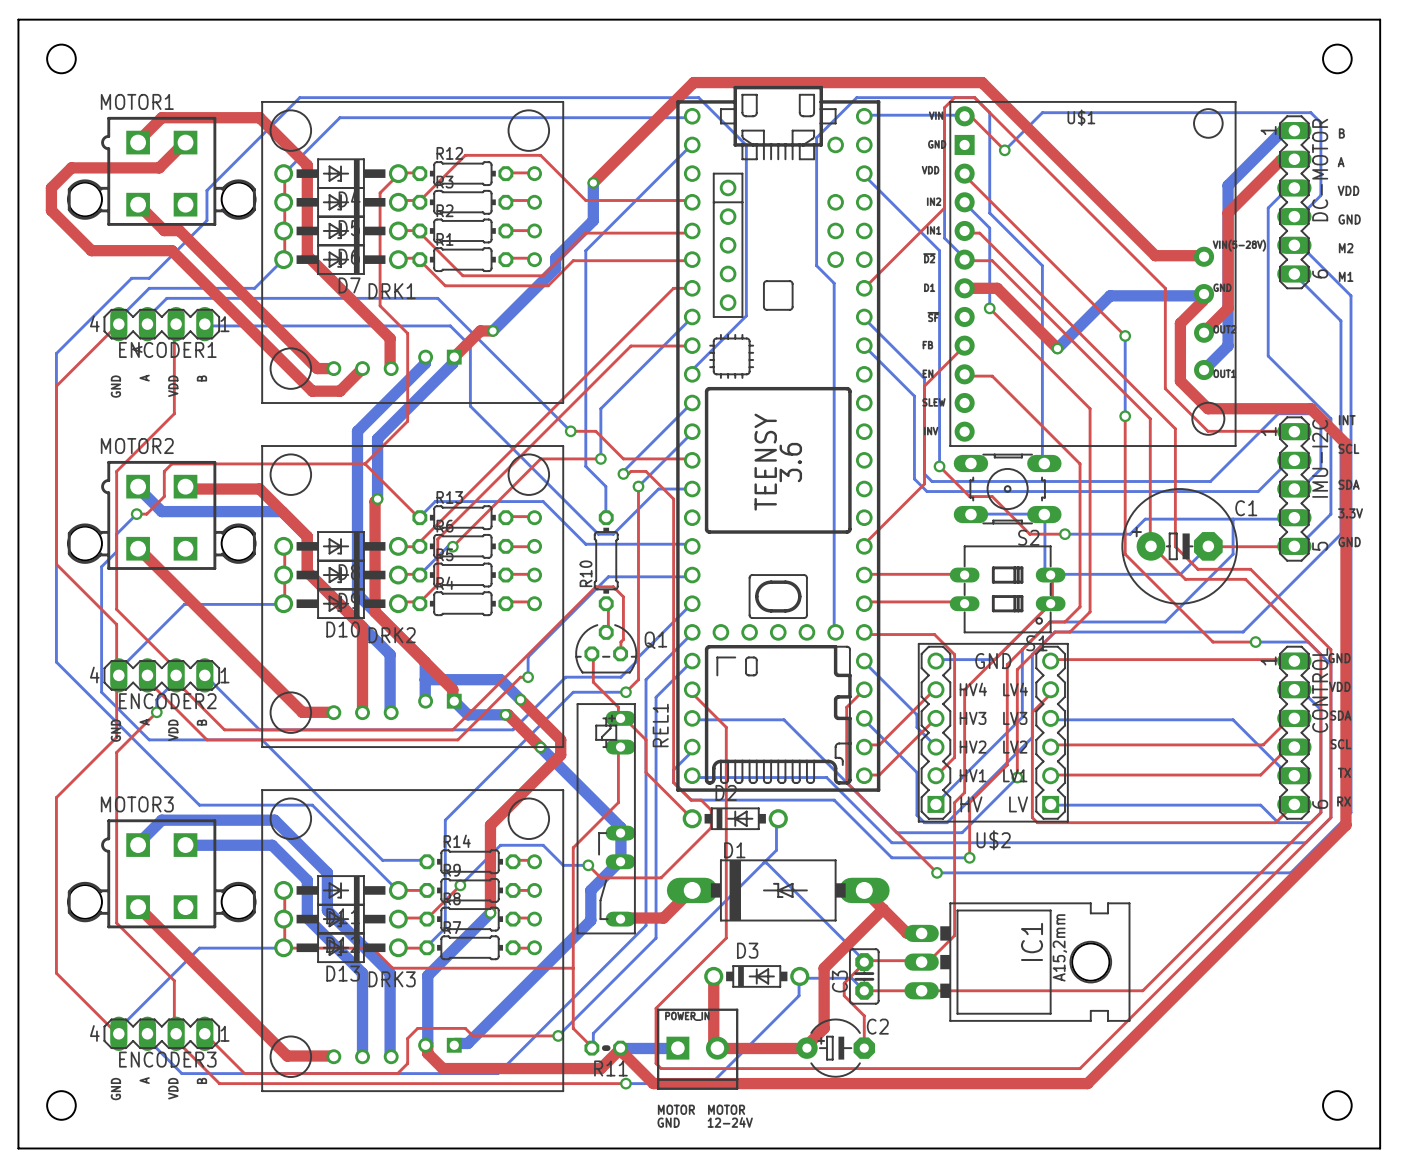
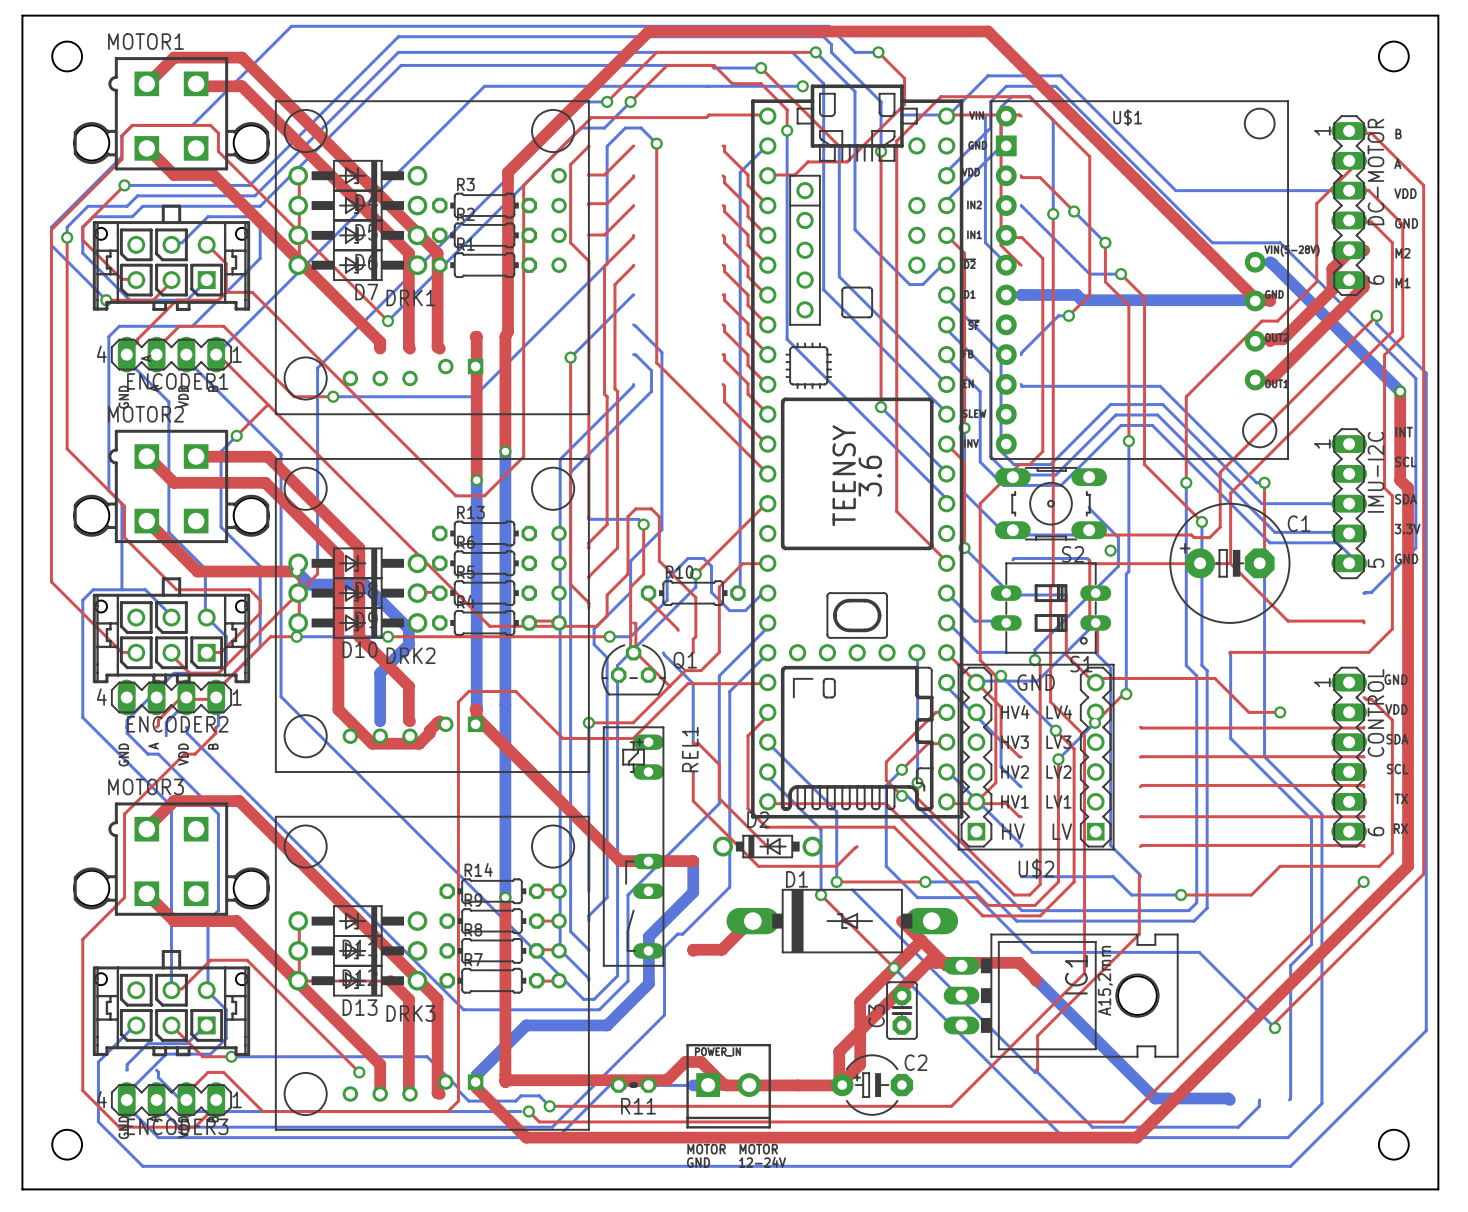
top track: none -> (815, 52) (656, 52) (607, 101)
bottom track: none -> (815, 52) (854, 91) (854, 229) (909, 284) (922, 284) (941, 266) (946, 265)
via: none -> (815, 52)
top track: none -> (878, 52) (904, 78) (904, 104) (847, 161) (808, 161) (794, 174) (767, 175)
bottom track: none -> (878, 52) (854, 52) (828, 26) (291, 26) (192, 125) (132, 125) (121, 135) (121, 156) (51, 227) (51, 245) (106, 300)
via: none -> (878, 52)
top track: none -> (761, 68) (839, 146)
bottom track: none -> (761, 68) (714, 68) (711, 65) (401, 65) (260, 206) (142, 206) (132, 216) (93, 216) (82, 227) (82, 253) (129, 300) (187, 300) (206, 280)
via: none -> (761, 68)
top track: none -> (146, 83) (174, 57) (241, 57) (437, 253) (437, 347) (439, 348)
bottom track: none -> (802, 86) (484, 86) (216, 354)
via: none -> (802, 86)
top track: (954, 97) (944, 107) (944, 208) (864, 288) -> (995, 96) (941, 96) (896, 141) (896, 511) (946, 563)
bottom track: (969, 97) (856, 97) (816, 137) (816, 265) (834, 283) (835, 632) -> (1011, 96) (1001, 107) (1001, 146) (948, 198) (948, 203) (946, 205)
top track: (974, 97) (1165, 288) (1165, 388) (1207, 431) (1294, 431) -> (1016, 96) (1029, 96) (1089, 156) (1089, 294) (1068, 315)
bottom track: (974, 97) (989, 112) (989, 213) -> (1016, 96) (1029, 96) (1053, 120) (1053, 214)
bottom track: none -> (607, 101) (583, 101) (317, 368) (317, 563)
via: none -> (607, 101)
top track: none -> (630, 101) (667, 65) (714, 65) (732, 83) (761, 83) (787, 109) (787, 130)
bottom track: none -> (630, 101) (604, 128) (581, 128) (388, 321)
via: none -> (630, 101)
bottom track: (906, 115) (964, 116) -> (946, 114) (948, 114) (988, 75) (1061, 75) (1175, 190) (1342, 190)
top track: none -> (1001, 114) (1001, 245) (1021, 265)
bottom track: (692, 116) (339, 117) (283, 173) -> none
top track: none -> (767, 116) (708, 114) (706, 117) (591, 117) (523, 185) (523, 456) (484, 495) (455, 495) (252, 292) (226, 292)
top track: none -> (946, 116) (1021, 116)
top track: (964, 116) (972, 117) (1004, 150) -> none
top track: (259, 117) (161, 117) (138, 142) -> (273, 117) (241, 86) (197, 86) (196, 83)
bottom track: none -> (787, 130) (787, 339) (946, 498) (946, 503)
via: none -> (787, 130)
bottom track: (1294, 130) (1293, 132) (1280, 132) (1228, 185) (1228, 346) (1204, 370) -> none
top track: none -> (1364, 131) (1371, 133) (1423, 185) (1423, 874) (1274, 1022) (1274, 1028)
top track: (185, 142) (159, 167) (71, 167) (51, 187) (51, 210) (76, 235) -> (124, 185) (82, 227) (82, 240)
top track: none -> (656, 143) (656, 362) (767, 473)
bottom track: none -> (656, 143) (641, 128) (625, 128) (607, 146) (607, 263) (474, 396) (333, 396)
via: none -> (656, 143)
top track: none -> (588, 145) (570, 164) (570, 242) (588, 261) (588, 518)
top track: none -> (633, 145) (604, 174) (588, 175)
top track: none -> (723, 145) (724, 151) (748, 174) (748, 185) (767, 205)
bottom track: (692, 144) (585, 250) (585, 466) (605, 486) (606, 517) -> none
bottom track: none -> (767, 145) (740, 172) (740, 592) (737, 593)
bottom track: none -> (839, 146) (839, 276) (946, 384)
top track: none -> (146, 148) (174, 174) (213, 174) (380, 341) (380, 348)
top track: none -> (881, 151) (881, 407)
bottom track: none -> (881, 151) (881, 101) (831, 52) (831, 44) (823, 36) (398, 36) (249, 185) (124, 185)
via: none -> (881, 151)
bottom track: (1004, 150) (1042, 112) (1310, 112) (1320, 122) (1320, 195) (1300, 215) (1294, 216) -> none
via: (1004, 150) -> none
top track: (1294, 159) (1280, 160) (1228, 213) (1228, 308) (1204, 332) -> none
top track: none -> (1364, 160) (1358, 161) (1316, 203) (1316, 281) (1277, 321) (1261, 321) (1186, 396) (1186, 482)
top track: (307, 165) (307, 255) (390, 338) (391, 368) -> (322, 167) (408, 253) (410, 348)
MOTOR1 position: (161, 171) -> (171, 113)
top track: (419, 173) (398, 173) (380, 192) (380, 305) (407, 333) (407, 421) (365, 463) -> none
R12: (462, 173) -> none
top track: (505, 173) (534, 173) -> none
top track: none -> (633, 175) (607, 203) (588, 203) (588, 205)
top track: none -> (723, 175) (724, 182) (748, 206) (748, 216) (767, 235)
bottom track: (864, 173) (939, 250) (939, 381) -> (946, 354) (948, 354) (948, 360) (980, 391)
bottom track: none -> (946, 175) (948, 174) (948, 169) (990, 128) (990, 101) (1006, 86) (1055, 86) (1212, 242) (1280, 242) (1415, 378) (1415, 548) (1371, 592)
top track: (964, 173) (1125, 335) -> none
top track: none -> (1021, 175) (1021, 177) (1040, 177) (1074, 211)
via: none -> (124, 185)
top track: (593, 182) (693, 82) (982, 82) (1155, 255) (1204, 256) -> none
bottom track: (593, 182) (593, 220) (555, 258) (555, 268) (492, 330) -> none
via: (593, 182) -> none
bottom track: (1288, 187) (1268, 208) (1268, 356) (1330, 418) (1330, 514) (1300, 544) (1295, 544) (1294, 546) -> none
top track: none -> (1364, 190) (1368, 190) (1402, 224) (1402, 336) (1384, 354) (1384, 488) (1392, 495) (1392, 628) (1368, 652) (1229, 652)
top track: (398, 202) (400, 200) (417, 200) (419, 202) (465, 155) (540, 155) (585, 200) (691, 200) (692, 202) -> (767, 265) (748, 245) (748, 234) (724, 211) (723, 205)
top track: (505, 202) (508, 200) (533, 200) (534, 202) -> none
top track: none -> (633, 205) (604, 234) (588, 235)
bottom track: (964, 202) (989, 228) (989, 308) -> none
bottom track: none -> (1021, 205) (1032, 216)
top track: (138, 204) (164, 230) (179, 230) (317, 368) (333, 368) -> none
bottom track: none -> (1074, 211) (1105, 242)
via: none -> (1074, 211)
via: none -> (1053, 214)
top track: none -> (1364, 220) (1371, 221) (1392, 242) (1392, 331) (1230, 493) (1229, 563)
top track: (398, 230) (419, 230) (462, 275) (543, 275) (585, 233) (691, 233) (692, 230) -> (767, 294) (748, 276) (748, 266) (724, 242) (723, 235)
top track: (505, 230) (534, 230) -> none
top track: none -> (633, 235) (604, 266) (607, 524) (588, 542) (588, 548)
bottom track: none -> (67, 237) (67, 227) (88, 206) (127, 206) (137, 195) (254, 195) (398, 52) (792, 52) (823, 83) (823, 289) (946, 414)
via: none -> (67, 237)
top track width: thick (76, 235) (91, 250) -> thin (82, 240) (98, 255)
top track: none -> (1105, 242) (1105, 281) (1128, 305) (1128, 441)
via: none -> (1105, 242)
bottom track: none -> (171, 244) (171, 242) (181, 242) (208, 216) (249, 216) (260, 227) (260, 258) (192, 326) (119, 326) (108, 336) (108, 490) (121, 503) (121, 589)
top track: none -> (206, 244) (226, 263) (226, 292)
bottom track: (1294, 245) (1300, 245) (1350, 295) (1350, 812) (1290, 872) (937, 872) -> none
top track: none -> (1364, 250) (1350, 250) (1332, 268) (1332, 289) (1282, 339) (1272, 339) (1270, 341)
top track: (91, 250) (171, 250) (312, 391) (339, 391) (362, 368) -> (98, 255) (121, 279) (136, 280)
part: none -> (171, 257)
top track: (999, 253) (1175, 428) (1175, 546) (1197, 569) (1250, 569) (1330, 649) (1330, 817) (1080, 1068) (911, 1068) -> none
bottom track: none -> (1270, 262) (1400, 391)
bottom track: (283, 259) (254, 288) (149, 288) (119, 318) (118, 324) -> none
top track: (398, 259) (417, 258) (445, 285) (548, 285) (573, 260) (692, 259) -> (767, 324) (748, 305) (748, 294) (724, 271) (723, 265)
top track: (505, 259) (534, 259) -> none
top track: none -> (633, 265) (614, 284) (614, 388) (617, 391) (617, 548) (588, 578)
top track: (964, 259) (992, 260) (1150, 418) (1151, 546) (1185, 579) (1245, 579) (1320, 654) (1320, 812) (1142, 990) (864, 990) -> none
bottom track: (1042, 265) (1042, 461) (1044, 463) -> (1087, 271) (1089, 274) (1121, 274)
top track: none -> (1121, 274) (1144, 297) (1144, 464) (1201, 521)
via: none -> (1121, 274)
top track: none -> (171, 280) (153, 300) (106, 300)
bottom track: (1294, 273) (1340, 320) (1340, 534) (1243, 632) (1054, 632) (1032, 654) (1032, 737) (947, 822) (924, 822) (916, 815) (916, 772) (864, 718) -> none
top track: none -> (1364, 280) (1363, 287) (1270, 379)
top track: none -> (226, 292) (218, 300) (176, 300) (137, 339) (137, 341) (126, 354)
bottom track: none -> (633, 294) (570, 357)
top track: (692, 288) (673, 288) (417, 544) (419, 546) (398, 546) -> (723, 294) (724, 300) (748, 323) (748, 334) (767, 354)
bottom track: none -> (946, 294) (948, 294) (948, 300) (1001, 352) (1001, 451) (1014, 464) (1050, 464) (1110, 404) (1162, 404) (1261, 503) (1349, 503)
top track: (964, 288) (997, 288) (1057, 348) -> none
bottom track: none -> (1021, 294) (1076, 294) (1081, 300) (1270, 300)
via: none -> (106, 300)
top track: (1204, 294) (1202, 300) (1180, 323) (1180, 381) (1207, 408) (1310, 408) (1345, 443) (1345, 825) (1087, 1083) (1077, 1083) -> (1363, 881) (1123, 1121)
bottom track: (1204, 294) (1202, 295) (1110, 295) (1057, 348) -> none
top track: none -> (1270, 300) (1256, 300) (988, 31) (648, 31) (508, 172) (505, 451)
top track: (989, 308) (1090, 408) (1090, 611) (1070, 632) (1054, 632) (1017, 669) (1017, 777) -> none
via: (989, 308) -> none
bottom track: none -> (1068, 315) (1058, 315) (1021, 354)
via: none -> (1068, 315)
top track: none -> (1376, 315) (1220, 472) (1220, 527) (1209, 537) (1194, 537) (1191, 534) (1092, 534)
bottom track: none -> (1376, 315) (1376, 323) (1426, 373) (1426, 1030) (1290, 1166) (142, 1166) (98, 1121) (98, 1061) (136, 1025)
via: none -> (1376, 315)
top track: none -> (388, 321) (218, 151) (218, 133) (210, 125) (132, 125) (121, 135) (121, 159) (51, 229) (51, 581) (121, 652) (136, 652)
via: none -> (388, 321)
top track: none -> (723, 324) (724, 331) (748, 354) (748, 365) (767, 384)
bottom track: (692, 316) (600, 408) (600, 458) -> none
bottom track: (864, 316) (924, 378) (924, 416) -> none
bottom track: none -> (946, 324) (948, 326) (948, 331) (990, 373) (990, 456) (1008, 474) (1055, 474) (1115, 414) (1157, 414) (1274, 532) (1364, 533)
top track: (118, 324) (56, 386) (56, 564) (116, 624) (116, 674) (118, 675) (116, 677) (116, 737) (56, 797) (56, 973) (118, 1033) -> none
bottom track: (147, 324) (149, 323) (149, 315) (166, 298) (437, 298) (570, 431) -> none
ENCODER1 position: (161, 324) -> (171, 354)
top track: (176, 324) (174, 325) (174, 413) (116, 471) (116, 491) -> (67, 237) (67, 448) (124, 506)
bottom track: (204, 324) (206, 325) (450, 325) (470, 346) (470, 406) (598, 534) (613, 534) -> (588, 921) (588, 915) (607, 897) (607, 657) (594, 644) (594, 628) (630, 592) (630, 561) (641, 550)
top track: none -> (475, 336) (476, 480)
top track: (492, 330) (480, 330) (454, 357) -> none
via: (492, 330) -> none
bottom track: (1125, 335) (1125, 416) -> none
via: (1125, 335) -> none
top track: none -> (156, 354) (158, 347) (179, 326) (223, 326) (294, 396) (333, 396)
top track: none -> (216, 354) (489, 626) (596, 626) (607, 615) (607, 595) (628, 574) (628, 516) (635, 508) (651, 508) (659, 516) (659, 561) (695, 597) (695, 636) (693, 639) (693, 652)
bottom track: none -> (633, 354) (651, 370) (651, 391) (570, 472) (570, 931) (588, 950)
top track: (692, 345) (630, 346) (437, 539) (437, 584) (419, 603) (417, 601) (400, 601) (398, 603) -> (723, 354) (724, 360) (748, 383) (748, 394) (767, 414)
bottom track: (864, 345) (914, 396) (914, 478) (927, 491) (1258, 491) (1288, 461) (1294, 460) -> none
top track: (964, 345) (924, 386) -> (946, 235) (964, 253) (964, 396)
top track: none -> (570, 357) (570, 584) (588, 602) (588, 608)
via: none -> (570, 357)
via: (1057, 348) -> none
bottom track: (425, 357) (425, 363) (357, 431) (357, 594) (425, 662) (425, 701) -> none
bottom track: (454, 357) (452, 363) (377, 438) (377, 499) -> none
bottom track: none -> (633, 384) (560, 459) (560, 949) (588, 978) (588, 980)
top track: none -> (723, 384) (724, 401) (767, 444)
bottom track: (692, 374) (693, 368) (746, 315) (746, 145) (698, 97) (299, 97) (206, 190) (206, 220) (149, 278) (131, 278) (56, 353) (56, 662) (199, 805) (312, 805) (398, 890) -> none
top track: (964, 374) (964, 376) (992, 376) (1080, 463) (1080, 606) (1064, 621) (1049, 621) (1007, 664) -> (1053, 214) (1053, 584) (1050, 587) (1050, 686)
bottom track: none -> (1021, 384) (1021, 386) (1160, 386) (1256, 482) (1264, 482)
top track: none -> (1400, 391) (1400, 480) (1408, 488) (1408, 866) (1136, 1137) (526, 1137) (476, 1088) (475, 1082)
via: none -> (1400, 391)
via: none -> (333, 396)
top track: none -> (268, 404) (236, 435)
bottom track: none -> (881, 407) (946, 473)
via: none -> (881, 407)
bottom track: (692, 403) (623, 471) (623, 473) -> none
top track: (924, 416) (924, 448) -> (946, 444) (964, 461)
via: none -> (964, 428)
top track: (1125, 416) (1125, 554) (1213, 642) (1255, 642) -> none
via: (1125, 416) -> none
bottom track: none -> (236, 435) (221, 451) (221, 527) (260, 566) (260, 647) (218, 688) (218, 725) (216, 727)
via: none -> (236, 435)
bottom track: none -> (1128, 441) (1126, 694)
via: none -> (1128, 441)
top track: (570, 431) (595, 431) (623, 458) (692, 460) -> none
via: (570, 431) -> none
bottom track: (692, 431) (638, 486) -> none
bottom track: none -> (505, 451) (505, 897)
via: none -> (505, 451)
part position: (778, 438) -> (857, 451)
top track: none -> (146, 456) (174, 482) (265, 482) (338, 555) (338, 709) (372, 743) (419, 743) (439, 721)
top track: none -> (196, 456) (268, 456) (359, 548) (359, 636) (408, 686) (410, 721)
bottom track: (939, 448) (939, 466) -> (980, 461) (1003, 485) (1061, 485) (1121, 425) (1152, 425) (1269, 542) (1337, 542) (1355, 561) (1363, 561) (1364, 563)
top track: (600, 458) (540, 458) (452, 546) -> none
via: (600, 458) -> none
top track: (365, 463) (419, 517) -> none
top track: (365, 463) (171, 463) (164, 471) (164, 496) (146, 514) (136, 514) -> none
bottom track: none -> (476, 480) (475, 709)
via: none -> (476, 480)
top track: (939, 466) (969, 496) (992, 496) (1029, 534) (1064, 534) -> none
via: (939, 466) -> none
bottom track: none -> (1186, 482) (1186, 665) (1196, 675) (1196, 902) (1188, 910) (1021, 910) (907, 795) (901, 795)
via: none -> (1186, 482)
top track: none -> (1264, 482) (1264, 558)
via: none -> (1264, 482)
top track: (623, 473) (628, 473) (630, 471) (646, 471) (673, 499) (673, 782) (691, 800) (701, 800) (711, 810) (711, 827) (661, 877) (600, 877) (588, 865) -> none
via: (623, 473) -> none
bottom track: (924, 473) (932, 481) (1210, 481) (1278, 413) (1310, 413) (1320, 423) (1320, 468) (1300, 489) -> (964, 488) (964, 493) (1006, 534) (1092, 534)
top track: (924, 484) (864, 546) -> (964, 498) (964, 548)
bottom track: (138, 486) (161, 511) (282, 511) (307, 536) (307, 571) (390, 654) (391, 712) -> none
top track: (185, 486) (186, 489) (259, 489) (307, 536) (307, 571) (362, 627) (362, 712) -> none
top track: (638, 486) (638, 679) (625, 692) -> none
via: (638, 486) -> none
bottom track: (692, 489) (658, 489) (633, 514) -> (633, 324) (661, 352) (661, 529)
top track: none -> (767, 503) (695, 574)
bottom track: none -> (1089, 506) (1118, 537) (1118, 566) (1034, 649) (1034, 660)
top track: (377, 499) (375, 501) (375, 611) (452, 689) (454, 701) -> none
via: (377, 499) -> none
bottom track: none -> (588, 518) (638, 519) (643, 524)
top track: none -> (146, 521) (197, 571) (296, 571)
bottom track: none -> (1201, 521) (1201, 665) (1207, 670) (1207, 908) (1194, 921) (1016, 921) (977, 881) (925, 881)
via: none -> (1201, 521)
top track: none -> (643, 524) (643, 574) (630, 587) (630, 647) (669, 686)
via: none -> (643, 524)
bottom track: (136, 514) (116, 534) (116, 551) (101, 566) (101, 692) (119, 709) -> (126, 354) (127, 360) (168, 401) (168, 532) (205, 568) (205, 615) (226, 636) (226, 665) (218, 673) (174, 673) (127, 720) (127, 733)
via: (136, 514) -> none
bottom track: (970, 514) (1044, 514) (1044, 569) (1050, 575) (1180, 574) (1208, 546) -> none
MOTOR2 position: (161, 515) -> (171, 486)
bottom track: (419, 517) (435, 501) (543, 501) (585, 544) (691, 544) (692, 546) -> none
top track: (505, 517) (534, 517) -> none
bottom track: (1294, 517) (1145, 519) (1130, 534) (1064, 534) -> none
bottom track: (1233, 519) (1233, 554) (1165, 621) (1049, 621) (1022, 649) (1022, 717) (935, 804) -> none
top track: (116, 521) (116, 609) (174, 667) (176, 682) (224, 729) (452, 729) (595, 586) (613, 586) (623, 596) (623, 639) (620, 642) (620, 653) -> (124, 537) (176, 589) (249, 589) (260, 600) (260, 613) (221, 652) (206, 652)
bottom track: none -> (964, 548) (1011, 595) (1066, 595)
via: none -> (964, 548)
bottom track: none -> (1264, 558) (1264, 756) (1321, 814) (1321, 1103) (1288, 1137) (1063, 1137) (894, 968)
bottom track: none -> (1012, 560) (1014, 558) (1087, 558) (1089, 560)
top track: none -> (317, 563) (317, 574) (218, 673) (189, 673) (171, 652)
bottom track: (452, 546) (447, 546) (419, 575) -> none
via: (452, 546) -> none
top track: (505, 546) (534, 546) -> none
top track: none -> (767, 563) (742, 563) (719, 587) (719, 652) (701, 670) (685, 670) (633, 722) (588, 722)
top track: none -> (1229, 563) (1288, 621) (1363, 621) (1364, 622)
top track: none -> (1229, 563) (1228, 563) (1089, 563) (1089, 560) (1089, 615) (1097, 623) (1097, 652) (1095, 652)
top track: (1208, 546) (1294, 546) -> none
top track: (138, 548) (302, 712) (333, 712) -> none
bottom track: none -> (296, 571) (309, 584) (364, 584) (408, 628) (408, 644) (380, 673) (380, 721)
via: none -> (296, 571)
via: none -> (695, 574)
R10 rotation: 0° (606, 560) -> 90° clockwise (693, 593)
bottom track: none -> (1371, 592) (1366, 592) (1364, 593) (1371, 592)
top track: (505, 575) (534, 575) -> none
top track: none -> (648, 593) (648, 600) (678, 630)
bottom track: (692, 575) (691, 576) (608, 576) (528, 657) (528, 677) -> none
bottom track: none -> (767, 593) (761, 595) (745, 610) (729, 610) (711, 592) (711, 566) (703, 558) (688, 558) (667, 579) (667, 600) (630, 636) (609, 636)
top track: (864, 575) (964, 575) -> none
bottom track: none -> (946, 593) (974, 621) (1006, 621) (1006, 622)
top track: (1050, 575) (1052, 576) (1052, 601) (964, 689) (964, 792) (954, 802) (954, 935) (929, 960) (864, 960) (864, 963) (844, 983) (844, 995) (864, 1015) (864, 1048) -> none
top track: none -> (1066, 595) (1066, 655) (1089, 678) (1214, 678) (1248, 712) (1280, 712)
bottom track: none -> (171, 617) (145, 589) (93, 589) (82, 600) (82, 717) (171, 806) (171, 990)
bottom track: (283, 603) (184, 604) (119, 669) (118, 675) -> none
bottom track: (692, 603) (620, 677) (565, 677) (513, 729) (259, 729) (206, 677) -> none
bottom track: none -> (767, 622) (766, 628) (719, 675) (719, 803) (628, 895) (628, 981) (599, 1009) (463, 1009) (187, 733) (186, 727)
top track: (864, 603) (864, 601) (964, 601) (964, 603) -> none
bottom track: none -> (946, 622) (977, 652) (1006, 652)
part: none -> (171, 630)
top track: none -> (296, 636) (270, 636) (208, 699) (179, 699) (158, 720) (156, 727)
bottom track: none -> (296, 636) (388, 636)
via: none -> (296, 636)
top track: none -> (388, 636) (609, 636)
via: none -> (388, 636)
via: none -> (609, 636)
bottom track: none -> (663, 652) (693, 683) (693, 742)
bottom track: (692, 632) (646, 679) (646, 925) (620, 950) -> (693, 861) (693, 892) (648, 936) (648, 983)
bottom track: none -> (767, 652) (729, 691) (729, 887) (682, 934) (677, 934) (664, 947) (664, 1015) (552, 1127) (179, 1127) (158, 1106) (156, 1099)
top track: (864, 632) (864, 634) (934, 634) (939, 639) -> (1042, 258) (1042, 451) (1029, 464) (1019, 464) (980, 503) (980, 660)
bottom track: none -> (916, 652) (917, 782)
top track: none -> (946, 652) (1001, 707) (1001, 738) (1021, 757)
bottom track: none -> (1095, 652) (1110, 668) (1110, 845) (1140, 876)
bottom track: none -> (1229, 652) (1230, 738) (1311, 819) (1311, 944) (1290, 965) (1289, 1099)
top track: none -> (1034, 660) (1040, 665) (1040, 884) (1029, 895) (1014, 895) (917, 798) (917, 782)
via: none -> (1034, 660)
bottom track: (1255, 642) (1308, 642) (1330, 664) (1330, 817) (1305, 842) (891, 842) (826, 777) (693, 777) (692, 775) -> none
via position: (1255, 642) -> (1280, 712)
top track: (591, 653) (593, 682) (618, 707) (618, 717) (620, 719) (625, 719) (646, 739) (646, 772) (692, 818) -> none
bottom track: none -> (1001, 675) (1055, 730)
via: none -> (1001, 675)
bottom track: (692, 661) (656, 697) (656, 938) (558, 1035) -> none
bottom track: (864, 661) (916, 714) (916, 727) (935, 747) -> none
bottom track: none -> (946, 682) (948, 683) (948, 688) (1001, 741) (1001, 767) (1021, 786)
top track: (1050, 661) (1294, 661) -> none
top track: none -> (1126, 694) (1123, 694) (1094, 722)
via: none -> (1126, 694)
top track: (147, 675) (149, 682) (206, 739) (457, 739) (520, 677) (528, 677) -> none
top track: none -> (1364, 697) (1371, 699) (1392, 720) (1392, 853) (1379, 866) (1280, 866) (1251, 895) (1181, 895)
via: (528, 677) -> none
bottom track: (425, 679) (500, 679) (520, 699) -> none
top track: (1007, 679) (1007, 764) (969, 802) (969, 857) -> (1050, 701) (1084, 735) (1084, 973) (951, 1106)
top track: none -> (475, 709) (476, 717) (620, 861) (693, 861)
top track: (692, 689) (693, 694) (726, 727) (726, 938) (656, 1008) (656, 1063) (661, 1068) -> none
top track: none -> (767, 712) (766, 717) (748, 735) (748, 808) (766, 827) (894, 827) (982, 915) (1040, 915) (1074, 881) (1074, 748) (1055, 730)
top track: (864, 689) (846, 707) (846, 782) (937, 872) -> none
top track: none -> (946, 712) (935, 712) (886, 761) (886, 780) (901, 795)
top track: (935, 689) (879, 744) (864, 744) (864, 747) -> none
top track: (1050, 689) (1049, 694) (1032, 712) (1032, 817) (1037, 822) (1275, 822) (1294, 804) -> none
bottom track: (1294, 689) (1300, 689) (1320, 709) (1320, 812) (1310, 822) (1278, 822) (1260, 805) (1050, 804) -> none
bottom track: (625, 692) (573, 692) (445, 820) (445, 928) (427, 947) -> none
via: (625, 692) -> none
top track: (520, 699) (560, 739) (560, 754) (490, 825) (490, 913) -> none
via: (520, 699) -> none
bottom track: none -> (588, 722) (588, 891)
via: none -> (588, 722)
bottom track: none -> (1094, 722) (1058, 759)
via: none -> (1094, 722)
bottom track: (454, 701) (467, 714) (505, 714) -> none
top track: none -> (1140, 727) (1364, 727)
via: none -> (1055, 730)
top track: (156, 712) (116, 752) (116, 787) -> (216, 727) (215, 733) (194, 754) (184, 754) (124, 814)
via: (156, 712) -> none
top track: (505, 714) (508, 714) (540, 747) -> none
via: (505, 714) -> none
top track: none -> (693, 742) (698, 743) (719, 764) (719, 798) (767, 846)
bottom track: (692, 718) (784, 719) (896, 832) (962, 832) (1017, 777) -> none
bottom track: none -> (767, 742) (836, 811) (836, 881)
top track: none -> (946, 742) (928, 743) (901, 769)
top track: (935, 718) (879, 775) (864, 775) -> none
bottom track: (1050, 718) (1233, 719) (1288, 775) (1294, 775) -> none
top track: (1294, 718) (1288, 719) (1263, 744) (1052, 744) (1050, 747) -> none
bottom track: (139, 729) (149, 739) (262, 739) (382, 860) (427, 861) -> (148, 754) (158, 754) (218, 814) (218, 910) (208, 921) (206, 990) (226, 1009) (226, 1038) (210, 1054) (166, 1054) (127, 1093) (127, 1106) (158, 1137) (557, 1137) (609, 1085) (648, 1085)
top track: none -> (1140, 757) (1364, 757)
top track: none -> (1058, 759) (1058, 881) (1034, 905) (988, 905) (886, 803) (768, 803) (767, 801)
via: none -> (1058, 759)
bottom track: none -> (901, 769) (886, 785) (886, 866) (917, 897) (977, 897) (1032, 952) (1199, 952) (1274, 1028)
via: none -> (901, 769)
bottom track: (540, 747) (620, 827) (620, 861) (590, 890) -> (695, 574) (695, 587) (617, 665) (617, 921)
via: (540, 747) -> none
top track: (620, 747) (618, 747) (618, 802) (573, 847) (573, 1028) (591, 1048) -> none
top track: none -> (693, 772) (693, 801) (758, 866) (836, 866) (857, 846)
bottom track: (692, 747) (691, 752) (673, 770) (673, 782) (691, 800) (834, 800) (891, 857) (969, 857) -> none
bottom track: none -> (767, 772) (768, 777) (821, 829) (821, 895)
bottom track: none -> (946, 772) (1021, 846)
top track: (1294, 747) (1288, 747) (1260, 775) (1050, 775) -> none
via: none -> (917, 782)
top track: none -> (1140, 786) (1364, 786)
via: none -> (901, 795)
top track: none -> (946, 801) (948, 803) (1006, 803) (1021, 816)
via: (1017, 777) -> none
top track: none -> (1140, 816) (1364, 816)
top track: none -> (146, 829) (174, 801) (239, 801) (437, 999) (437, 1093) (439, 1094)
bottom track: (778, 818) (776, 820) (776, 850) (593, 1033) (591, 1048) -> none
top track: none -> (1140, 846) (1364, 846)
bottom track: (138, 845) (161, 820) (274, 820) (327, 872) (327, 910) (390, 973) (391, 1056) -> none
bottom track: (185, 845) (272, 845) (307, 880) (307, 918) (362, 973) (362, 1056) -> none
bottom track: none -> (1021, 876) (1113, 876) (1131, 895) (1181, 895)
top track: none -> (1140, 876) (1139, 934) (1037, 1035) (1036, 1070)
top track: none -> (836, 881) (925, 881)
via: none -> (836, 881)
via: none -> (925, 881)
via: none -> (1363, 881)
via: (969, 857) -> none
bottom track: none -> (852, 889) (1092, 1127) (1238, 1127) (1259, 1106) (1259, 1099)
bottom track: (763, 862) (766, 862) (864, 962) -> none
top track: none -> (146, 893) (174, 921) (236, 921) (380, 1064) (380, 1094)
bottom track: (588, 865) (563, 865) (543, 845) (500, 845) (460, 885) -> none
via: (588, 865) -> none
top track: none -> (821, 895) (894, 968)
via: none -> (821, 895)
via: none -> (1181, 895)
top track: (116, 867) (116, 923) (174, 980) (174, 1033) (176, 1033) (176, 1040) (219, 1083) (515, 1083) -> (124, 897) (82, 939) (82, 1090) (119, 1127) (194, 1127) (215, 1106) (216, 1099)
top track: none -> (505, 897) (505, 1082)
via: none -> (505, 897)
via: (937, 872) -> none
MOTOR3 position: (161, 873) -> (171, 859)
top track: (460, 885) (427, 919) (398, 919) -> none
via: (460, 885) -> none
top track: (398, 890) (427, 890) -> none
bottom track width: thick (590, 890) (590, 920) -> thin (617, 921) (617, 952)
top track: (692, 890) (663, 918) (620, 919) -> none
top track: none -> (752, 921) (750, 921) (721, 949) (693, 950)
D1 position: (778, 890) -> (842, 921)
top track: (138, 907) (287, 1056) (333, 1056) -> none
bottom track: (490, 913) (427, 975) (427, 1043) (425, 1045) -> none
via: (490, 913) -> none
bottom track: (590, 920) (467, 1043) (455, 1043) -> (617, 952) (617, 975) (594, 999) (583, 999) (281, 696) (281, 454) (187, 360) (186, 354)
via: none -> (894, 968)
bottom track: (283, 947) (199, 948) (139, 1008) -> (206, 1025) (187, 1043) (148, 1043)
top track: (427, 947) (400, 948) -> none
top track: none -> (1036, 980) (1019, 962) (935, 962) (930, 960) (839, 1051) (838, 1085)
bottom track: none -> (1036, 980) (1154, 1098) (1229, 1099)
top track width: thin (372, 948) (390, 965) -> thick (390, 981) (408, 999)
bottom track width: thin (620, 950) (580, 990) -> thick (648, 983) (607, 1025)
top track: none -> (171, 990) (181, 988) (210, 960) (247, 960) (359, 1072)
top track: (390, 965) (392, 968) (573, 968) -> (408, 999) (410, 1094)
part: none -> (171, 1003)
top track: (713, 976) (713, 1043) (717, 1048) (721, 1048) -> (505, 1080) (667, 1080) (685, 1061) (701, 1061) (723, 1085) (753, 1085)
D3: (756, 976) -> none
top track: none -> (171, 1025) (202, 1056) (231, 1056)
bottom track: (580, 990) (497, 1073) -> (607, 1025) (526, 1025) (476, 1075) (476, 1080)
bottom track: (864, 990) (851, 978) (801, 978) (799, 976) (799, 995) (711, 1083) (625, 1083) -> none
via: none -> (1274, 1028)
bottom track: none -> (231, 1056) (427, 1056) (468, 1101) (515, 1101) (521, 1095) (539, 1095) (549, 1106)
via: none -> (231, 1056)
ENCODER3 position: (161, 1033) -> (171, 1099)
top track: (204, 1033) (244, 1073) (249, 1073) -> (186, 1099) (187, 1093) (208, 1072) (223, 1072) (262, 1111)
via: none -> (359, 1072)
top track: (558, 1035) (472, 1035) (465, 1028) (417, 1028) (407, 1038) (407, 1063) (397, 1073) -> (767, 682) (688, 683) (633, 738) (562, 738) (515, 691) (468, 691) (458, 701) (458, 1101) (448, 1111) (416, 1111)
via: (558, 1035) -> none
top track: (425, 1045) (427, 1045) (427, 1053) (442, 1068) (525, 1068) -> none
bottom track width: thick (620, 1048) (663, 1048) -> thin (648, 1085) (693, 1085)
top track width: thick (525, 1068) (600, 1068) -> thin (549, 1106) (628, 1106)
via: none -> (549, 1106)
top track: (600, 1068) (620, 1048) (623, 1053) (653, 1083) -> (628, 1106) (690, 1106)
top track: none -> (528, 1111) (539, 1121)
via: none -> (528, 1111)
top track: none -> (654, 1121) (682, 1121)
via: (625, 1083) -> none
top track width: thick (653, 1083) (1077, 1083) -> thin (682, 1121) (1123, 1121)

